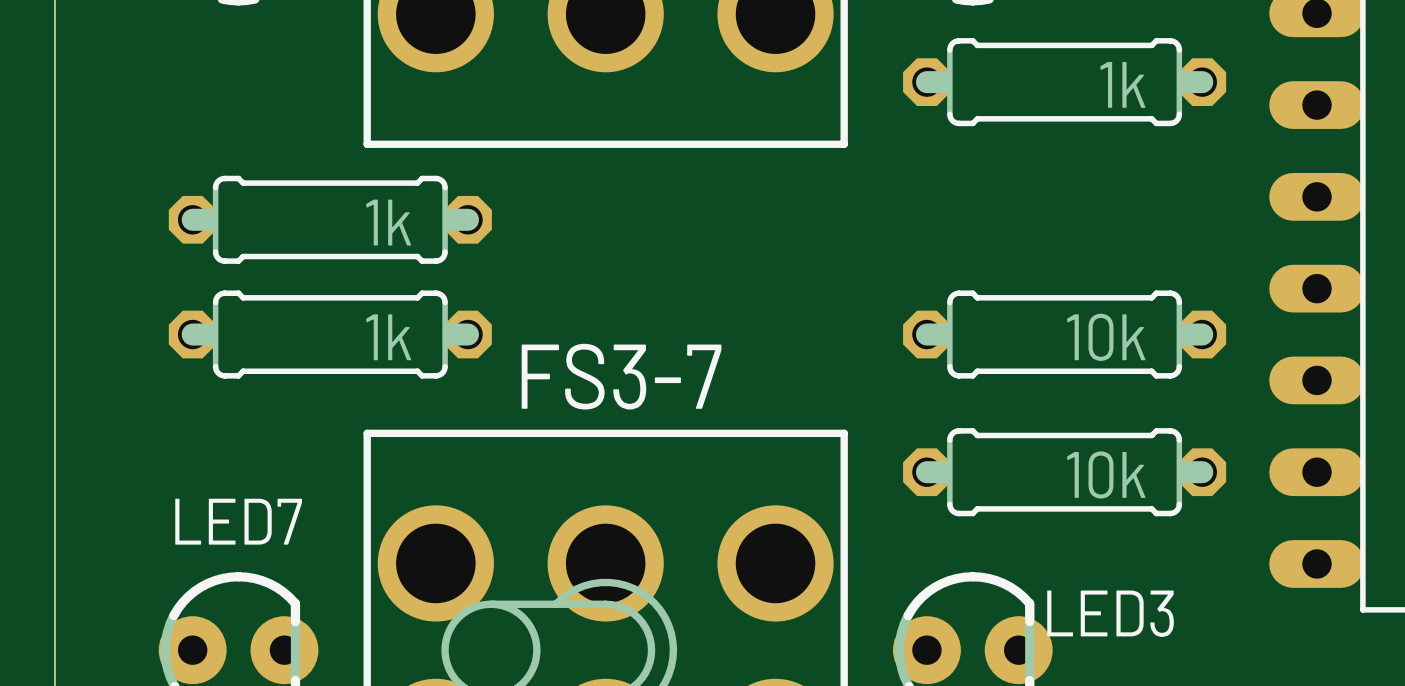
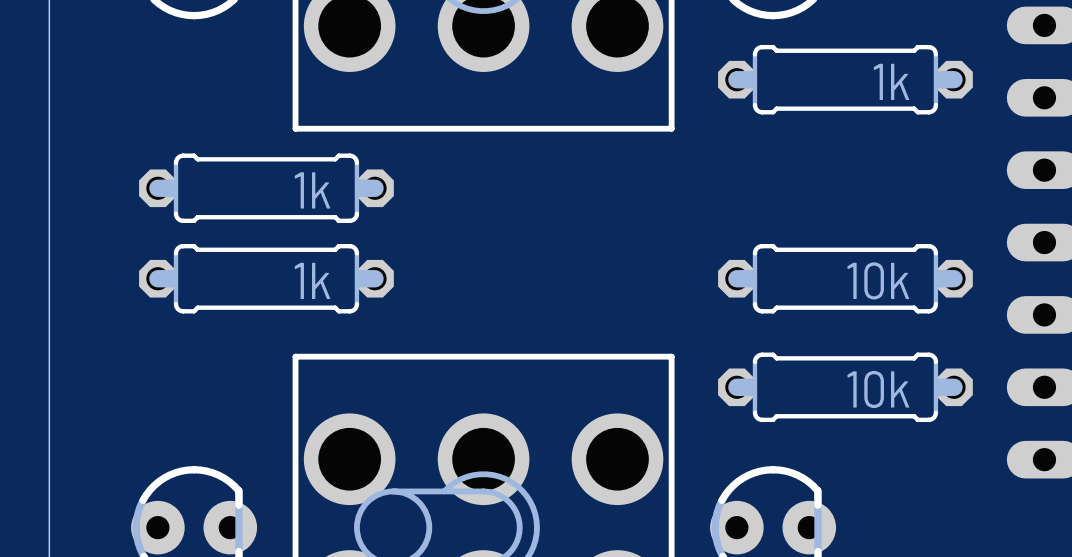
FS3-7 name: FS3-7 (621, 376) -> none
LED7 name: LED7 (238, 521) -> none
LED3 name: LED3 (1110, 613) -> none

